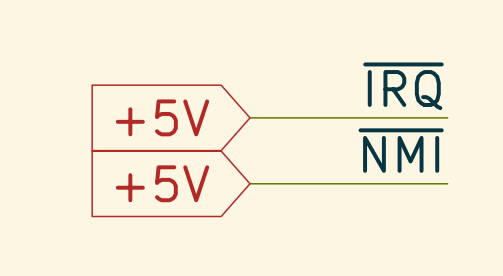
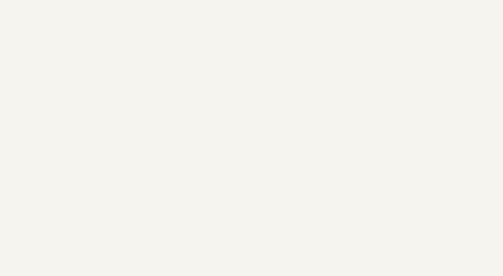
label: ~{IRQ} (403, 86) -> none
global label: +5V (162, 117) -> none
wire: (250, 117) (447, 117) -> none
label: ~{NMI} (401, 150) -> none
global label: +5V (162, 183) -> none
wire: (250, 183) (447, 183) -> none

